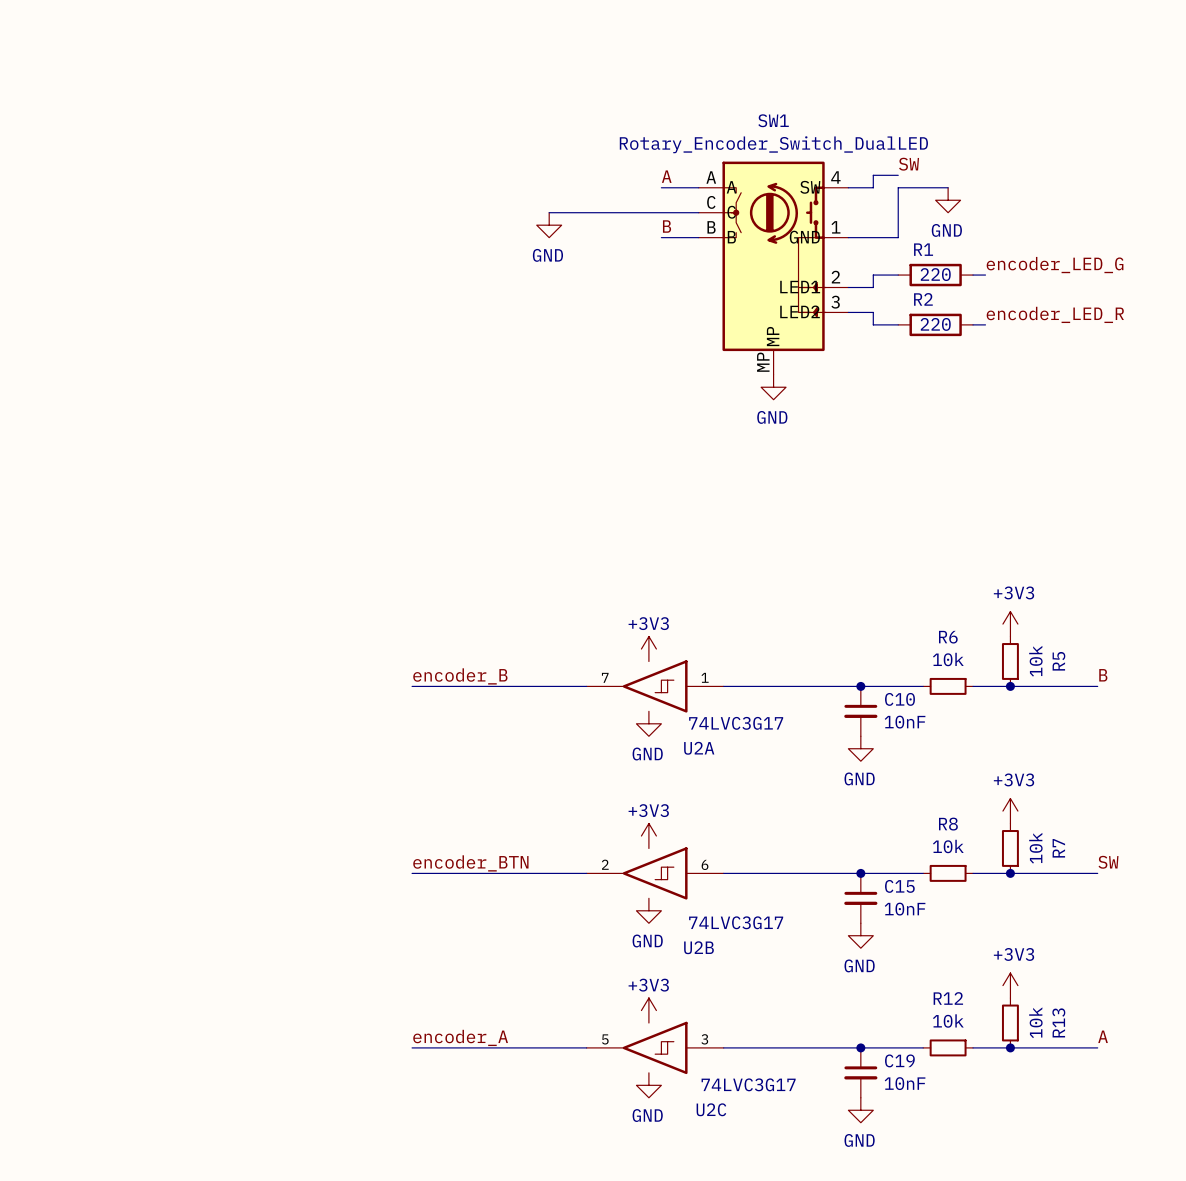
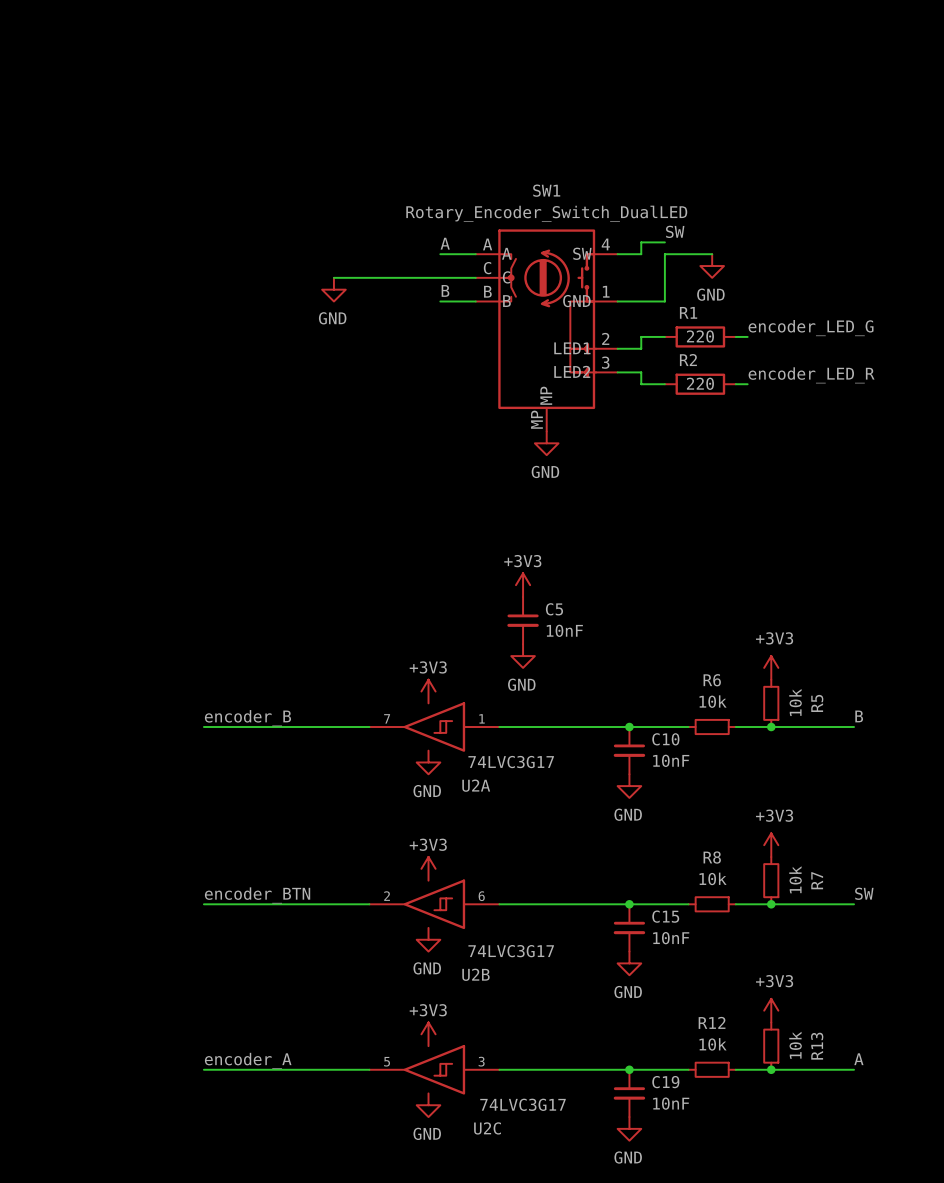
power symbol: none -> +3V3 (523, 585)
C5: none -> 10nF (523, 620)
power symbol: none -> GND (523, 656)

